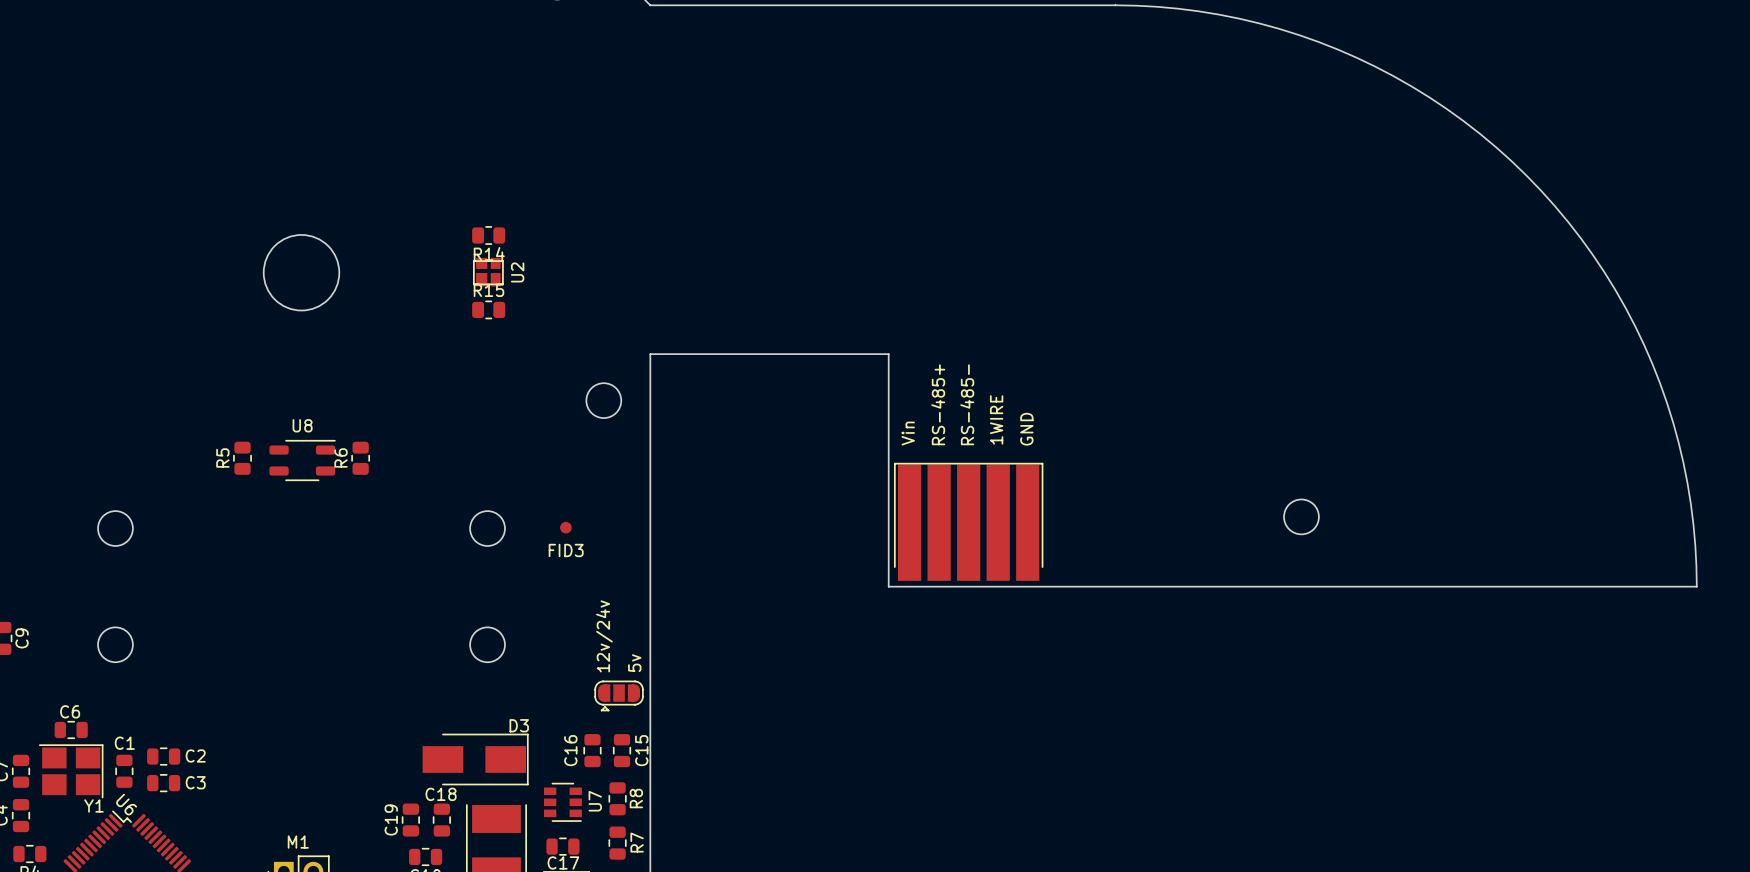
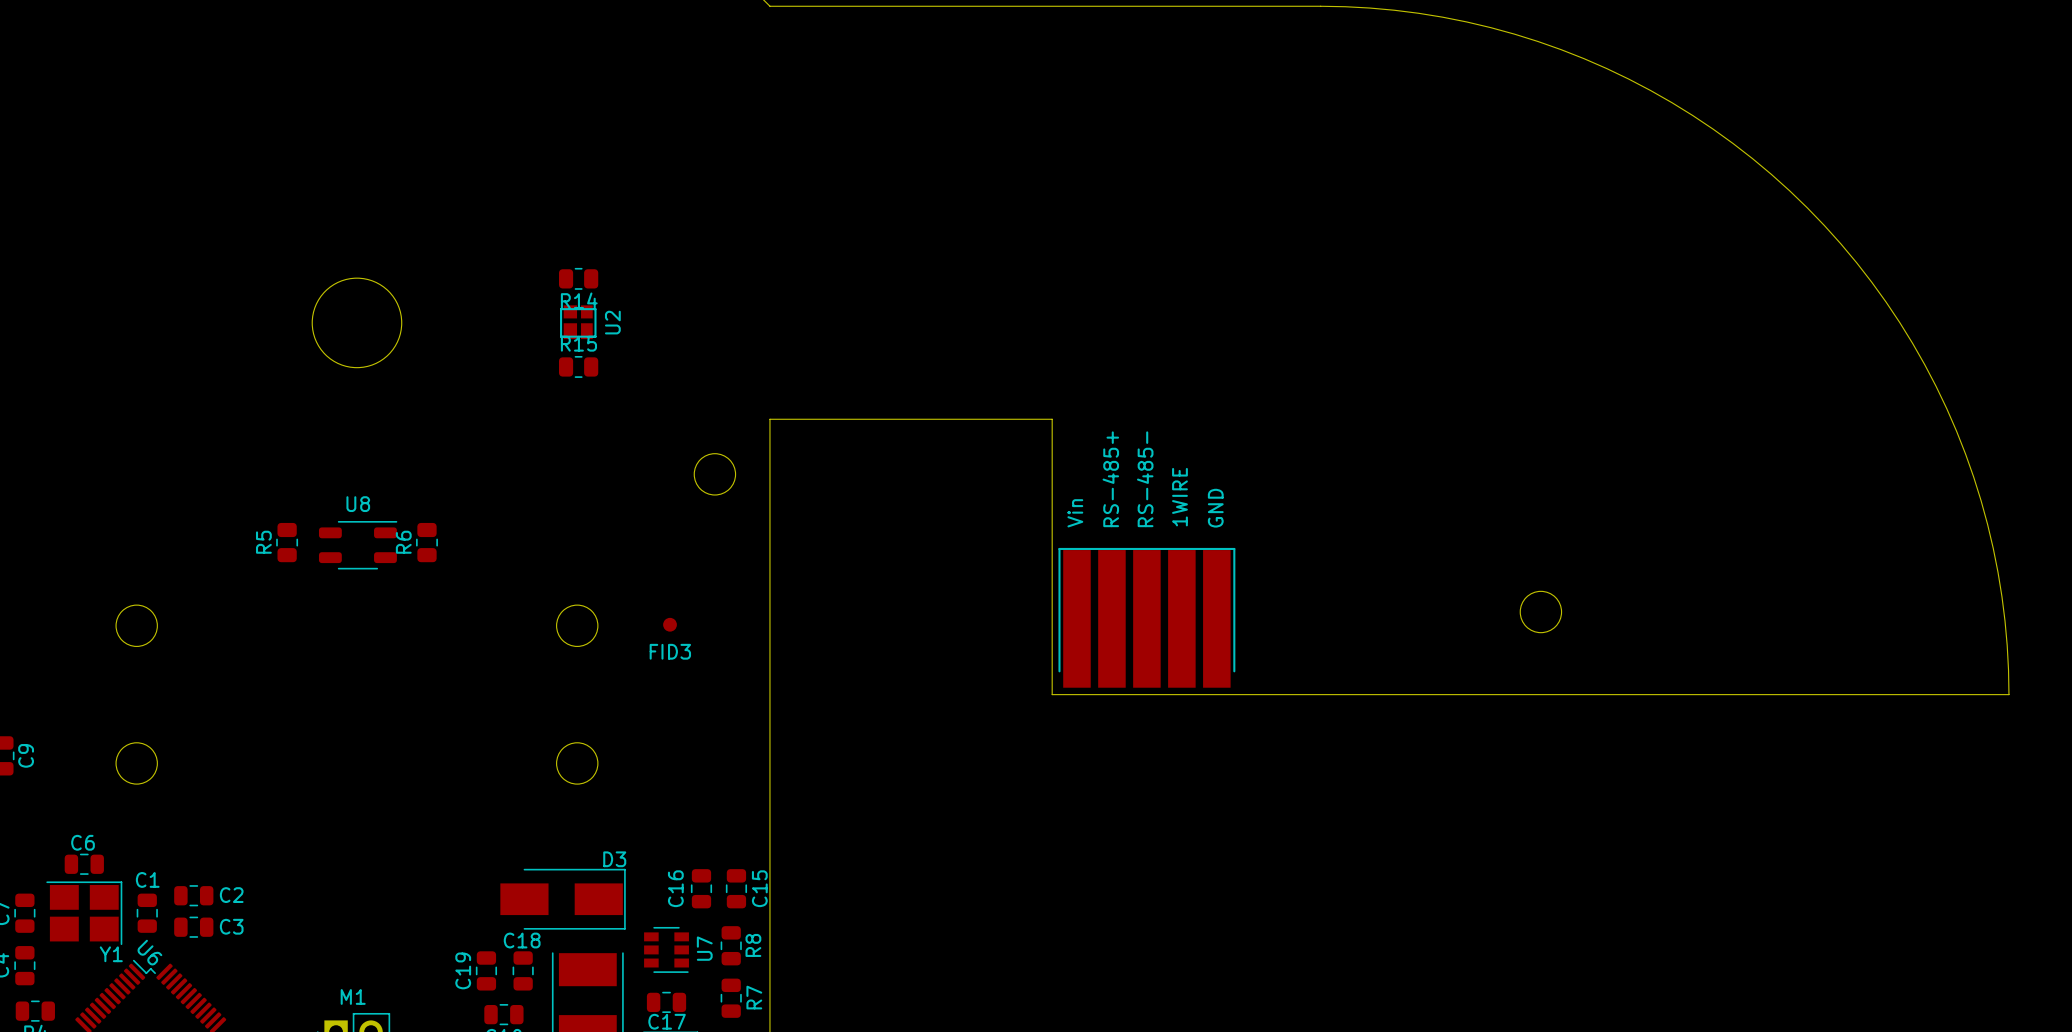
text: 12v/24v (604, 636) -> none
text: 5v (634, 663) -> none
part: (619, 695) -> none

